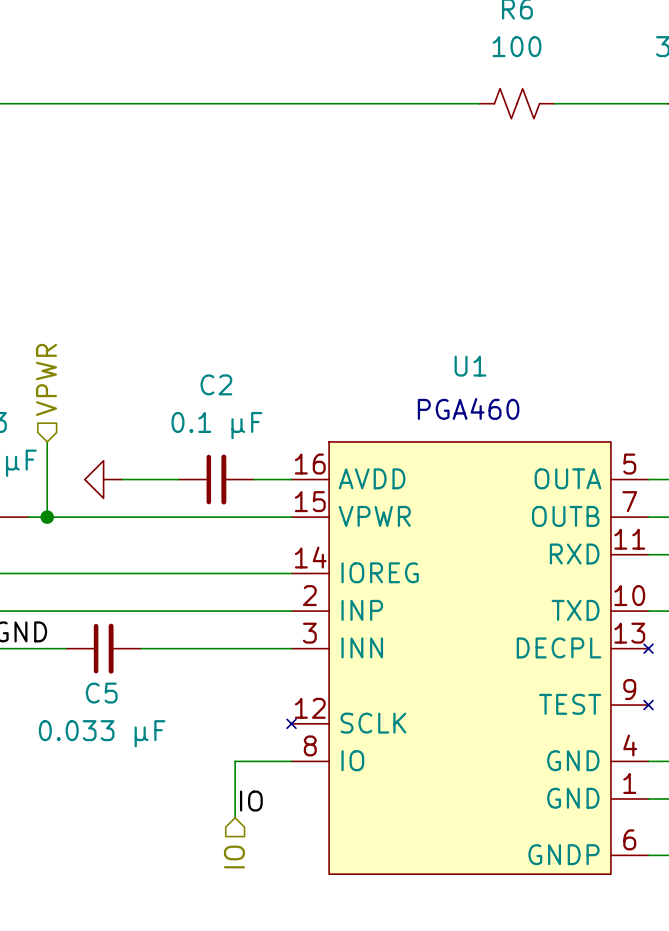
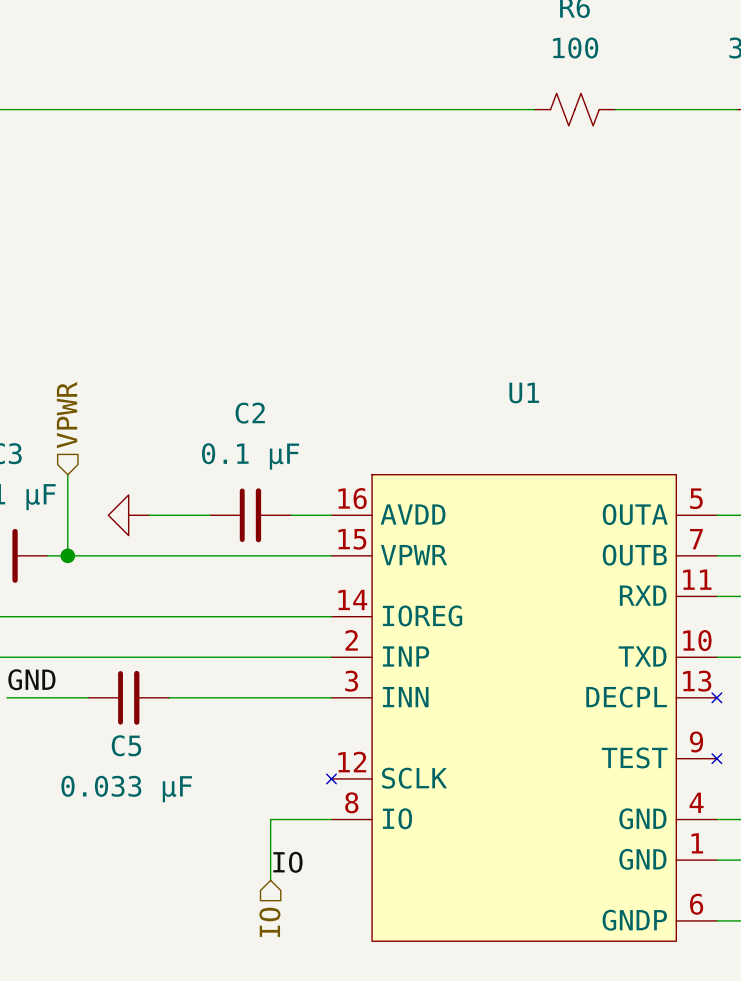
text: PGA460 (468, 408) -> none

